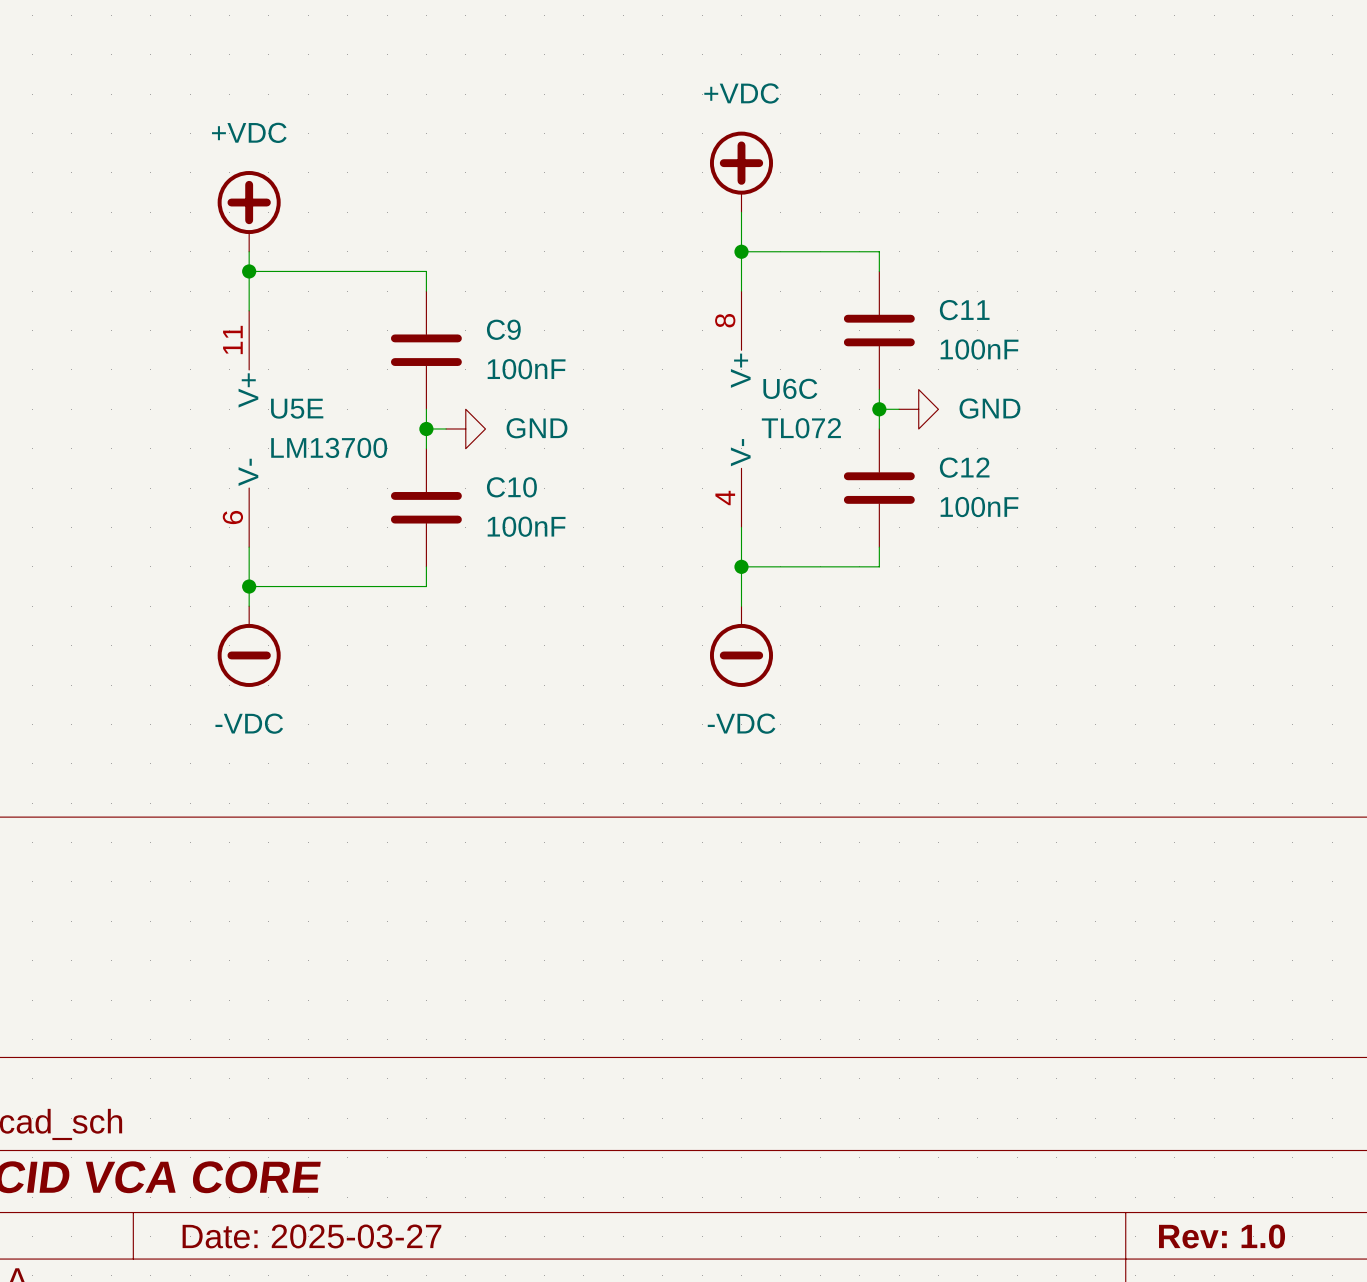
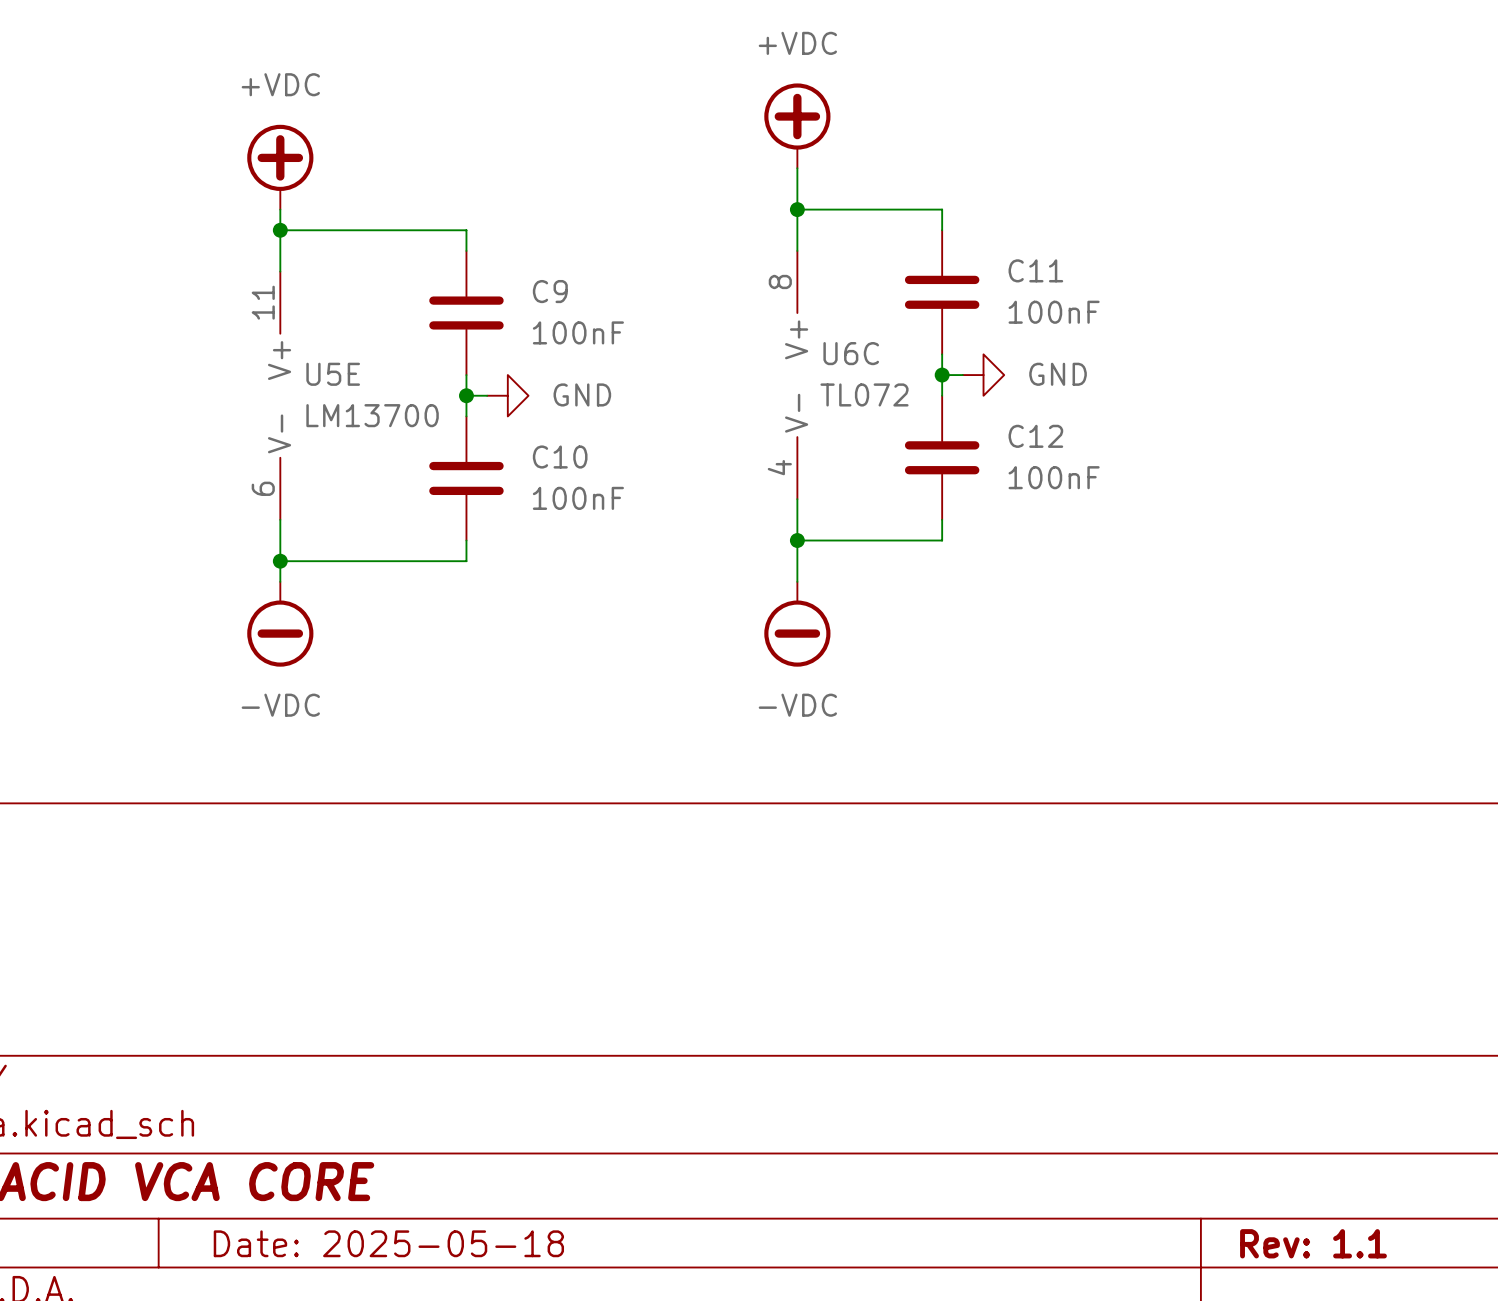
title block: Date: 2025-03-27 (311, 1236) -> Date: 2025-05-18 (388, 1243)
title block: Rev: 1.0 (1222, 1236) -> Rev: 1.1 (1313, 1243)

